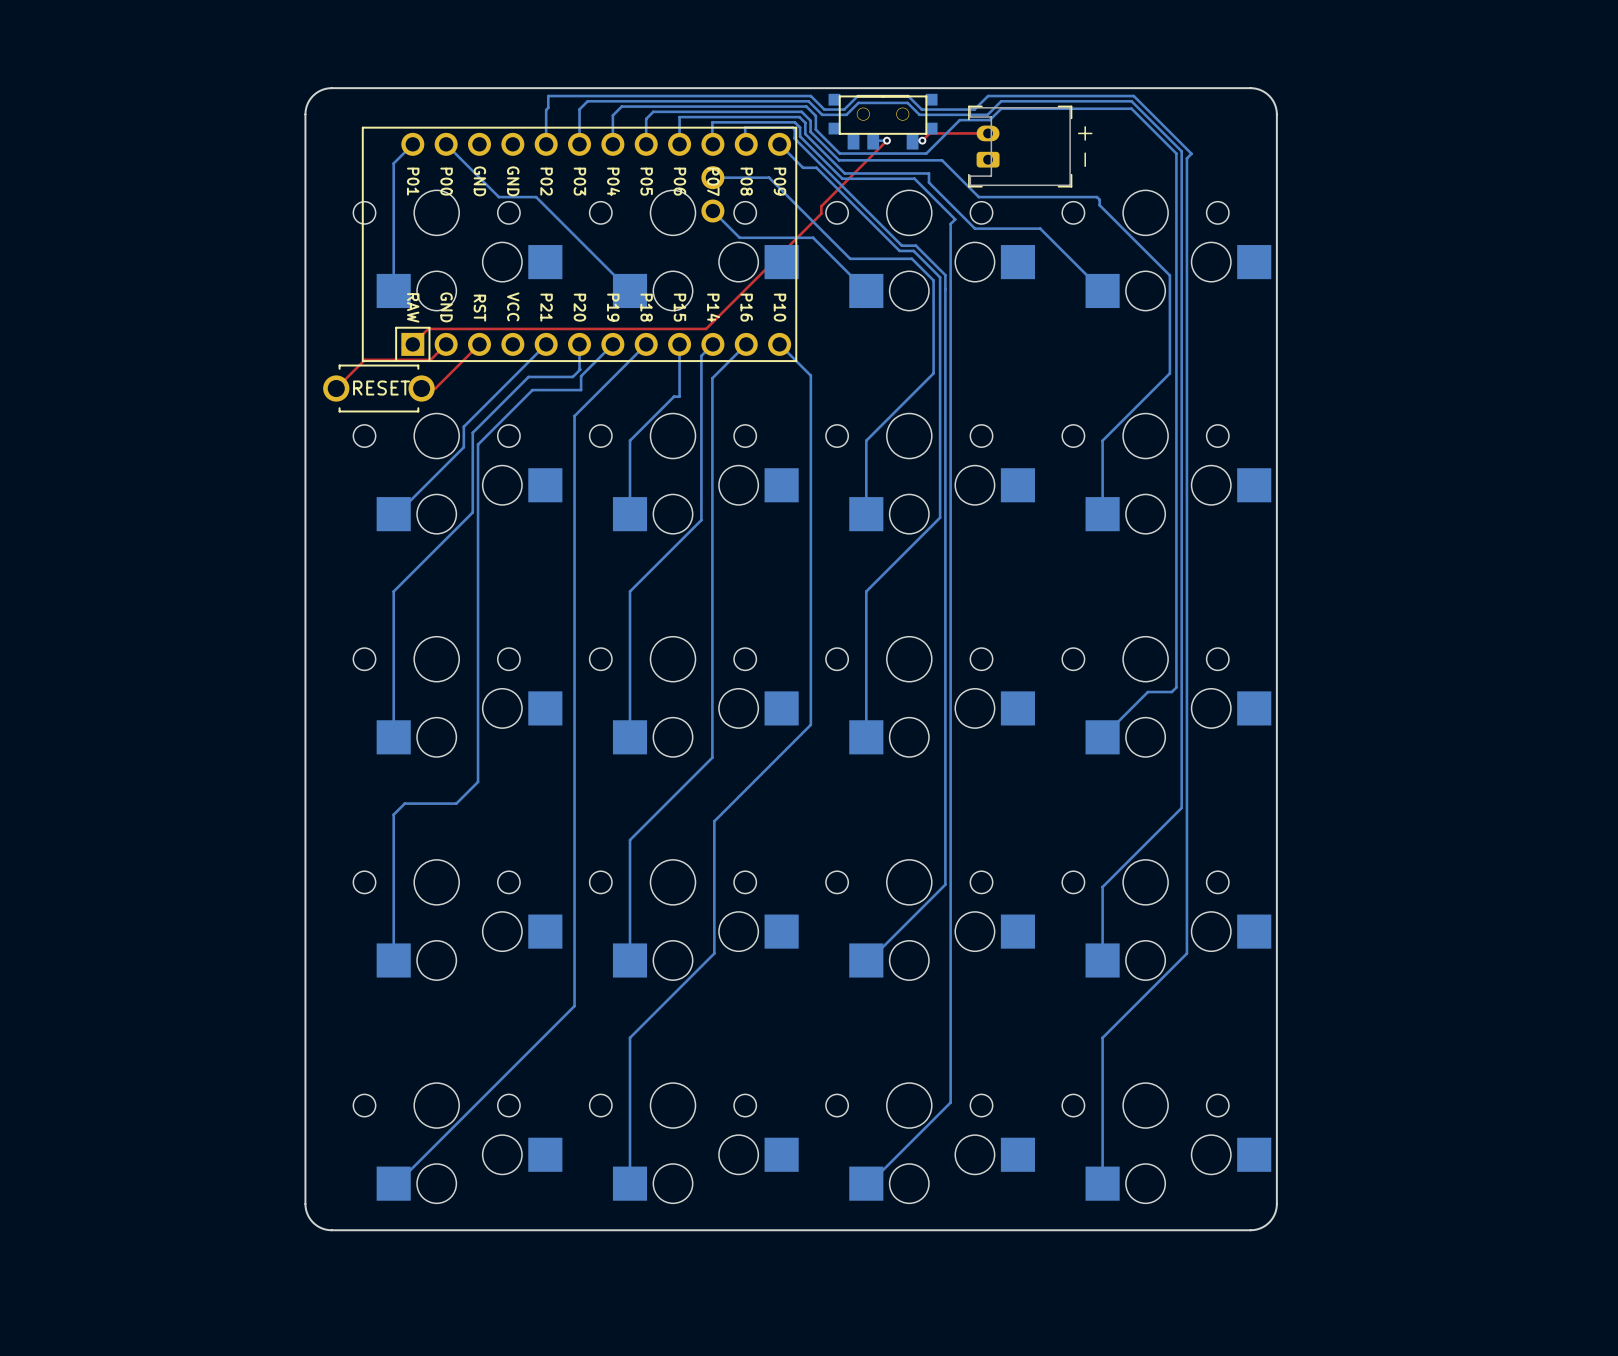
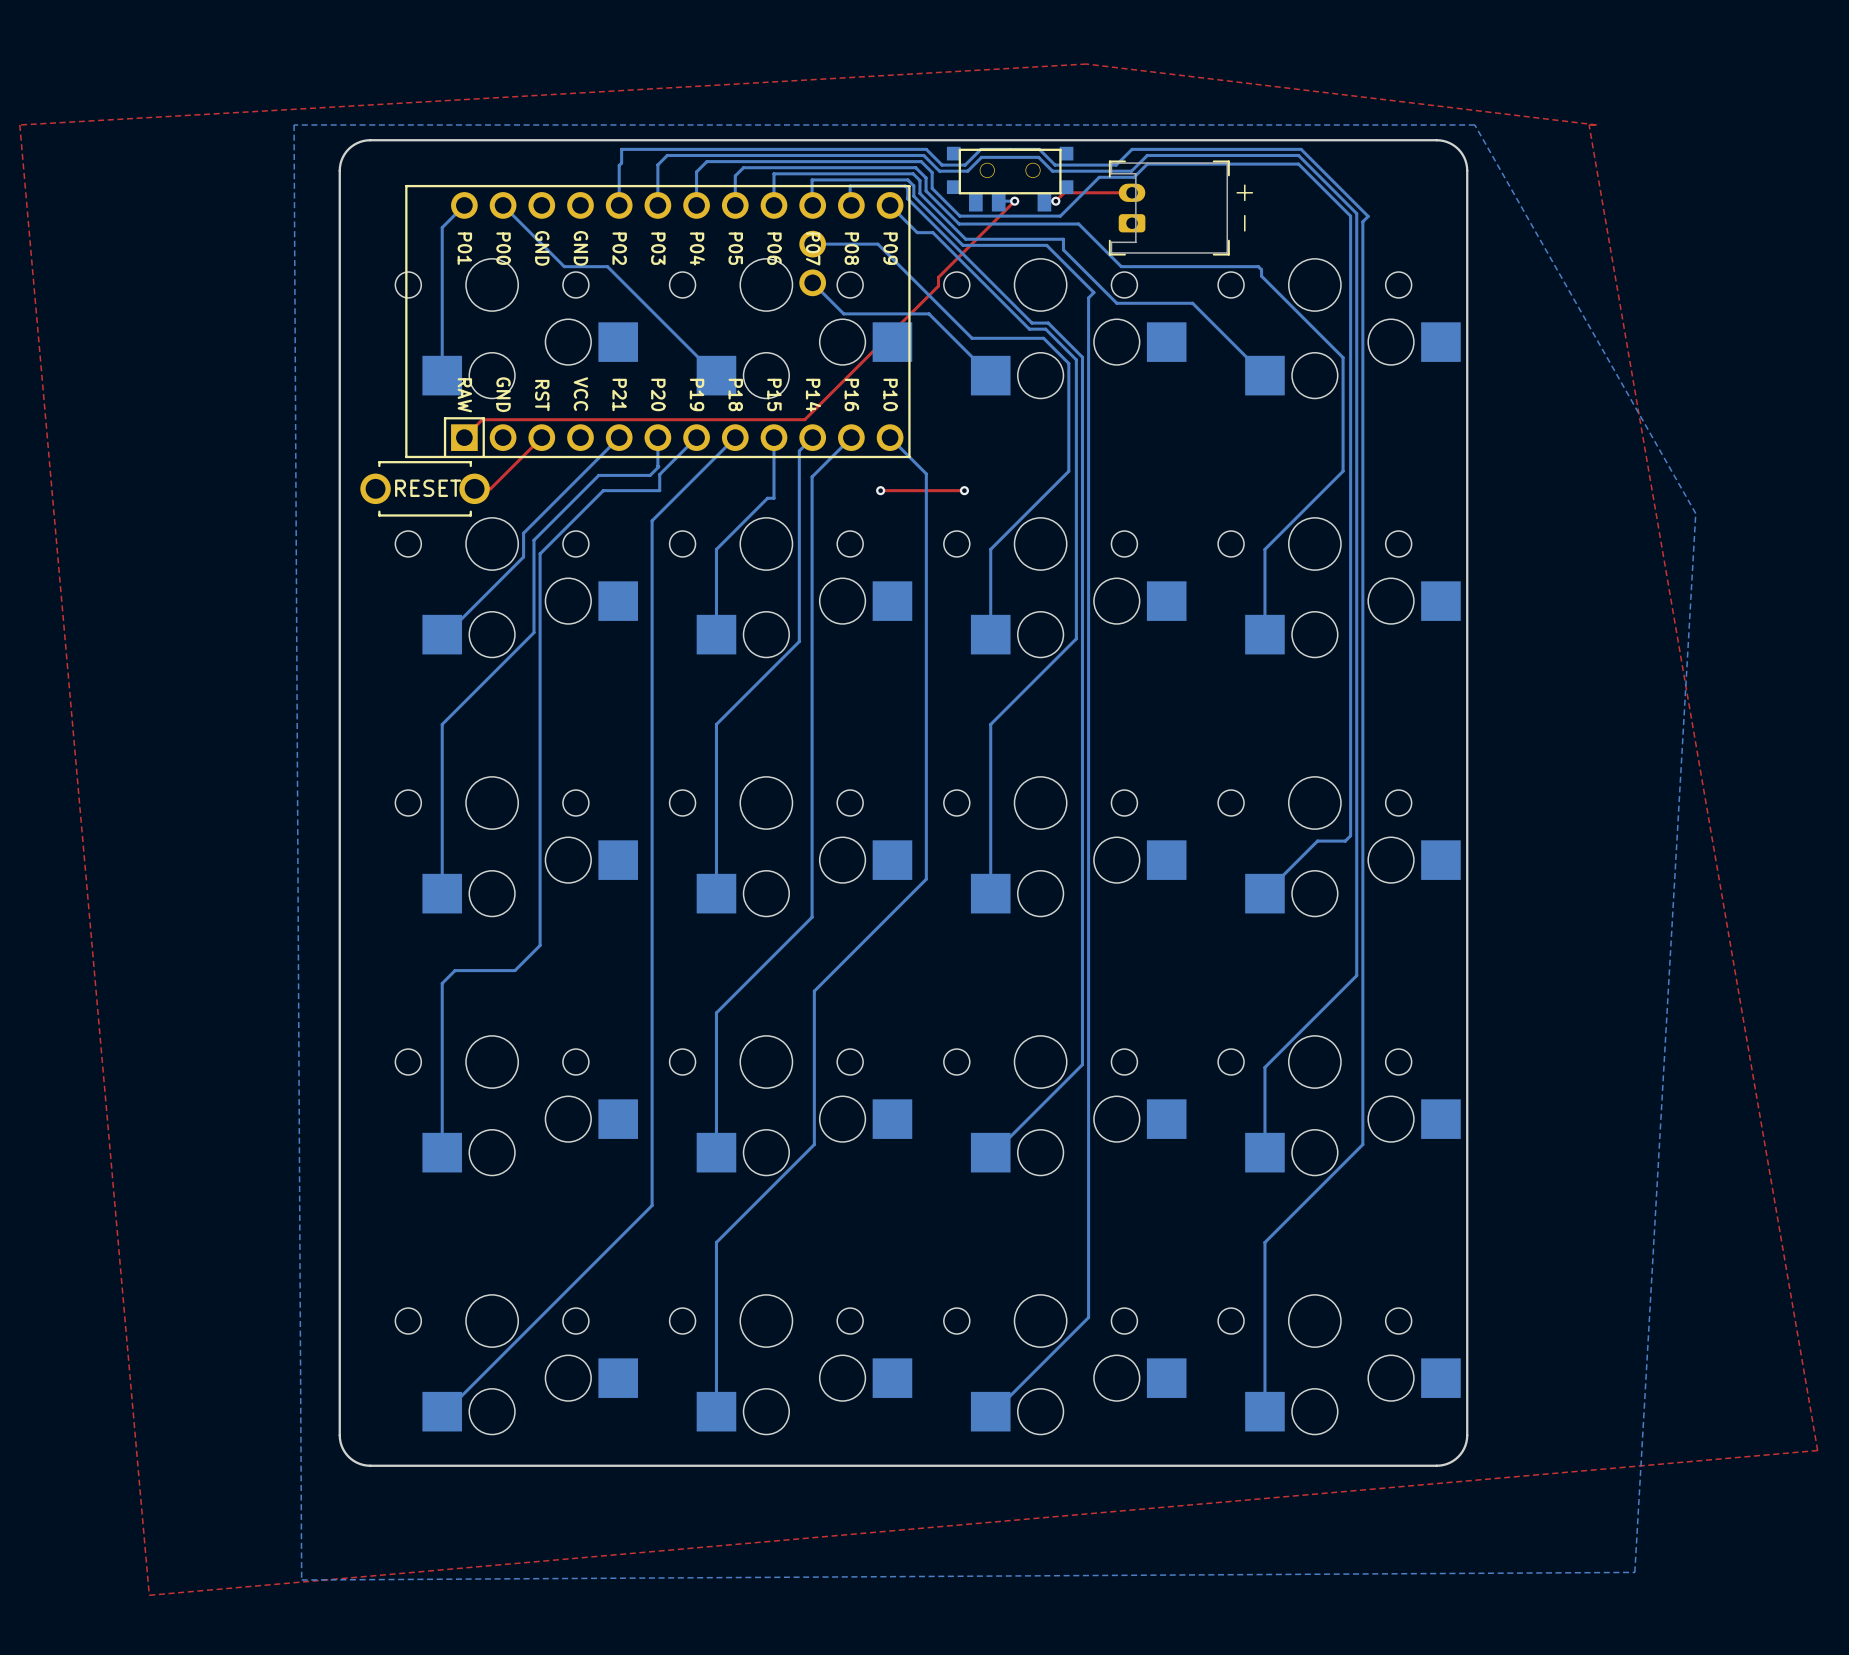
top zone outline: none -> (1086, 64) (1596, 124) (1589, 124) (1817, 1450) (149, 1595) (19, 124) (1086, 64)
bottom zone outline: none -> (1474, 124) (294, 124) (301, 1580) (1634, 1572) (1695, 513) (1474, 124)
top track: (446, 344) (430, 359) (364, 359) (336, 388) -> none
via: none -> (880, 490)
top track: none -> (964, 490) (880, 490)
via: none -> (964, 490)

